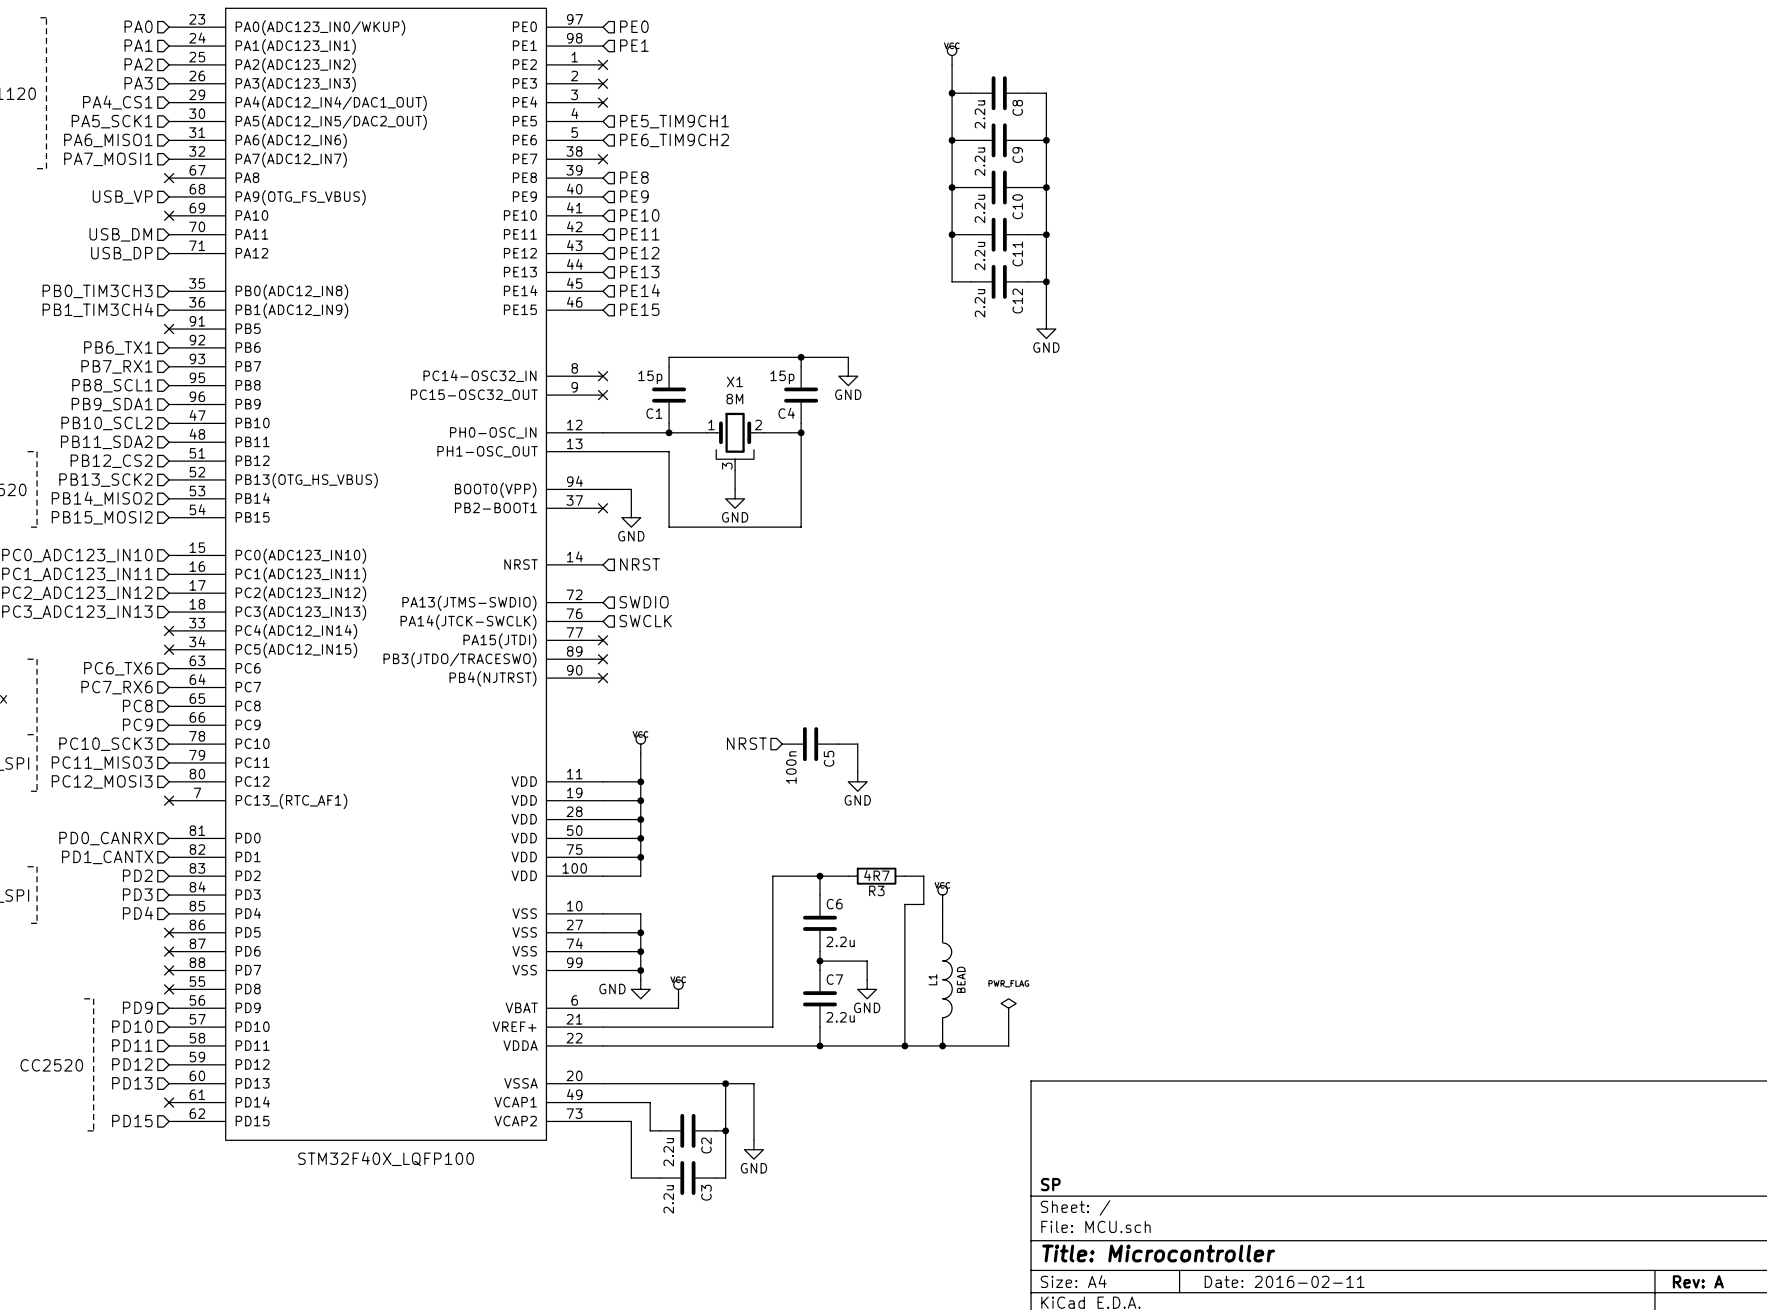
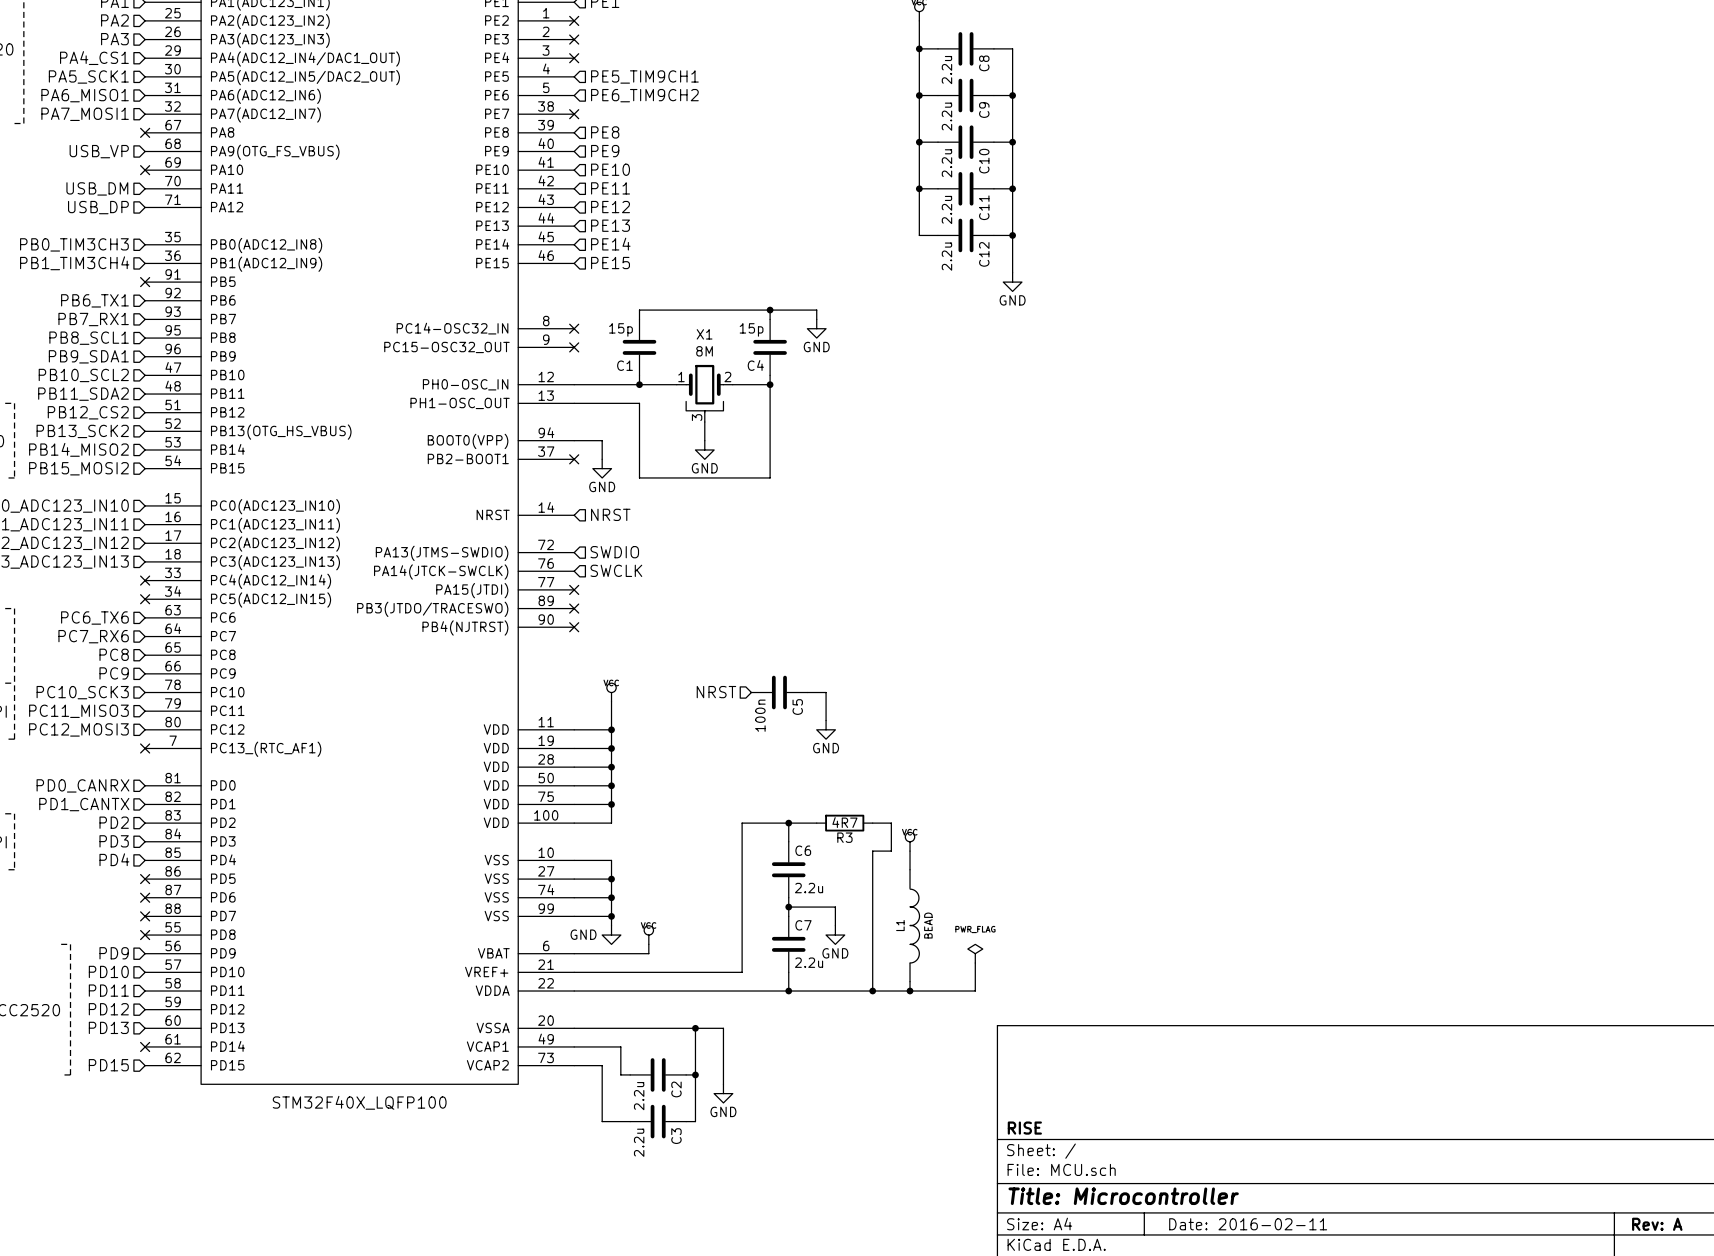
title block: SP (1050, 1184) -> RISE (1024, 1128)

